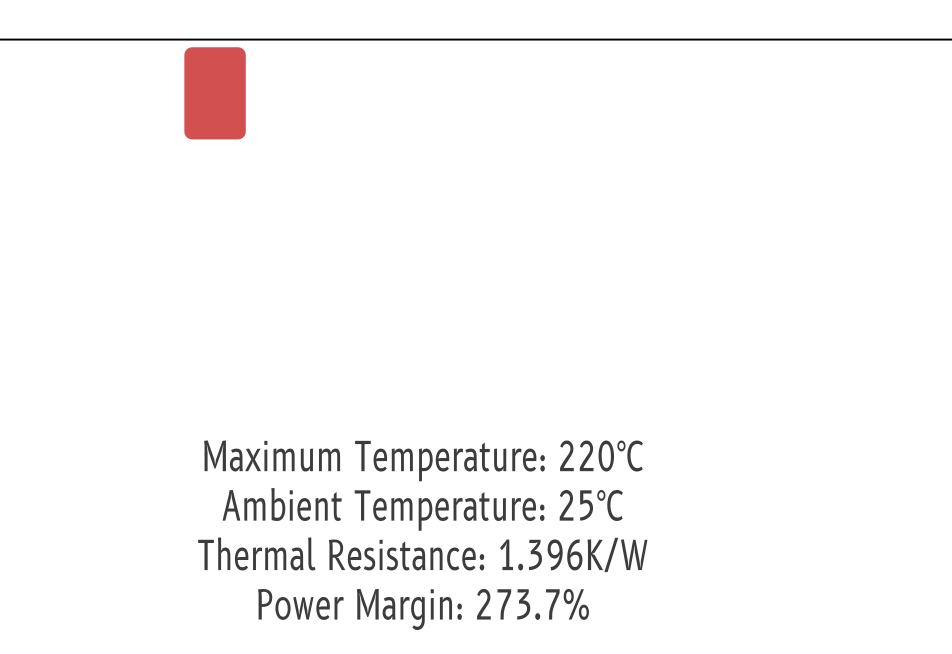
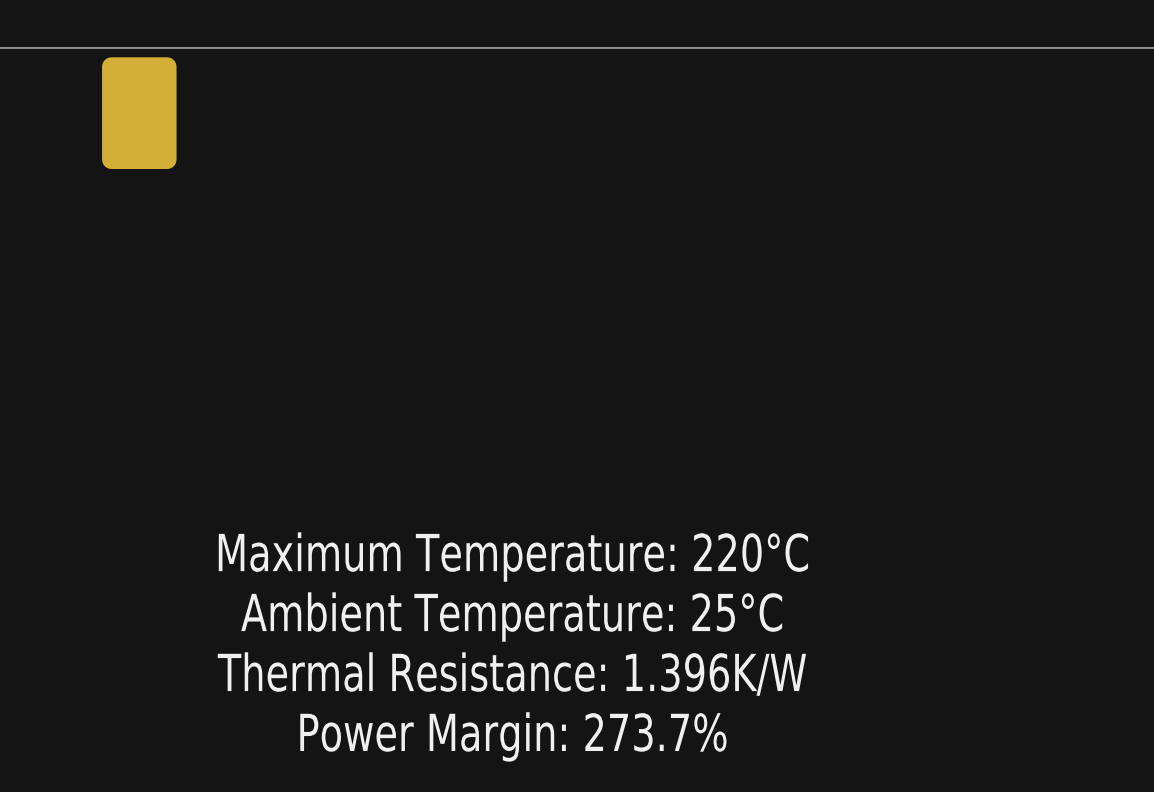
part position: (215, 93) -> (139, 113)

